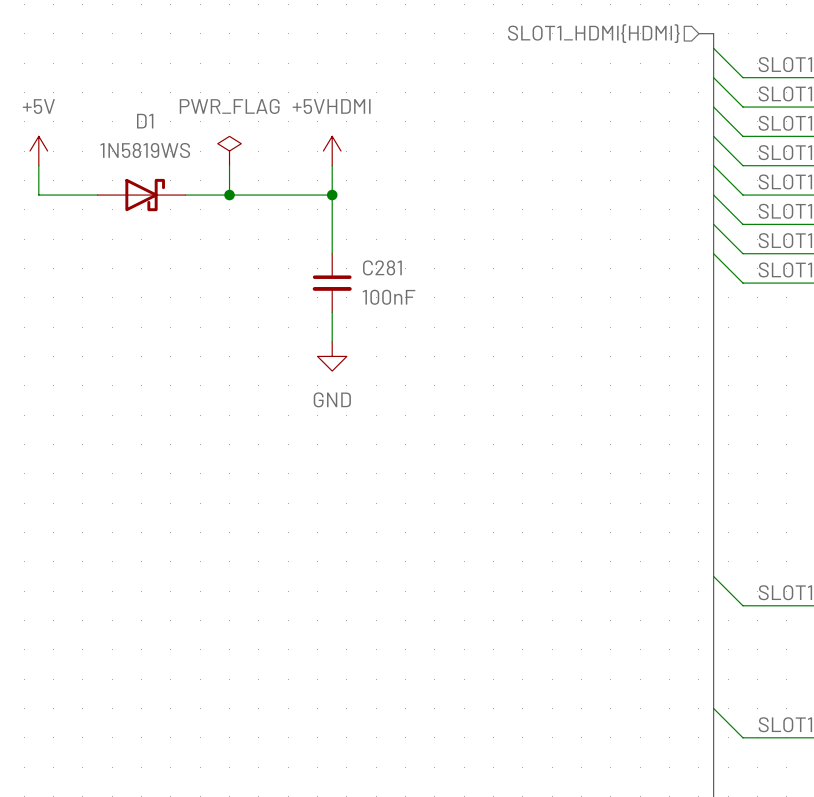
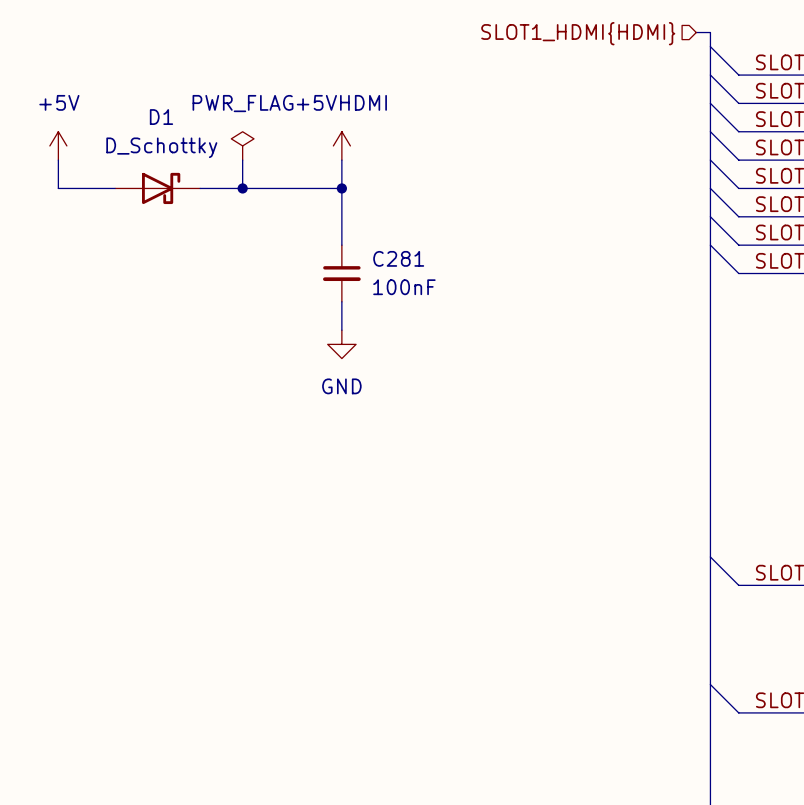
D1 value: 1N5819WS (145, 150) -> D_Schottky (161, 147)

